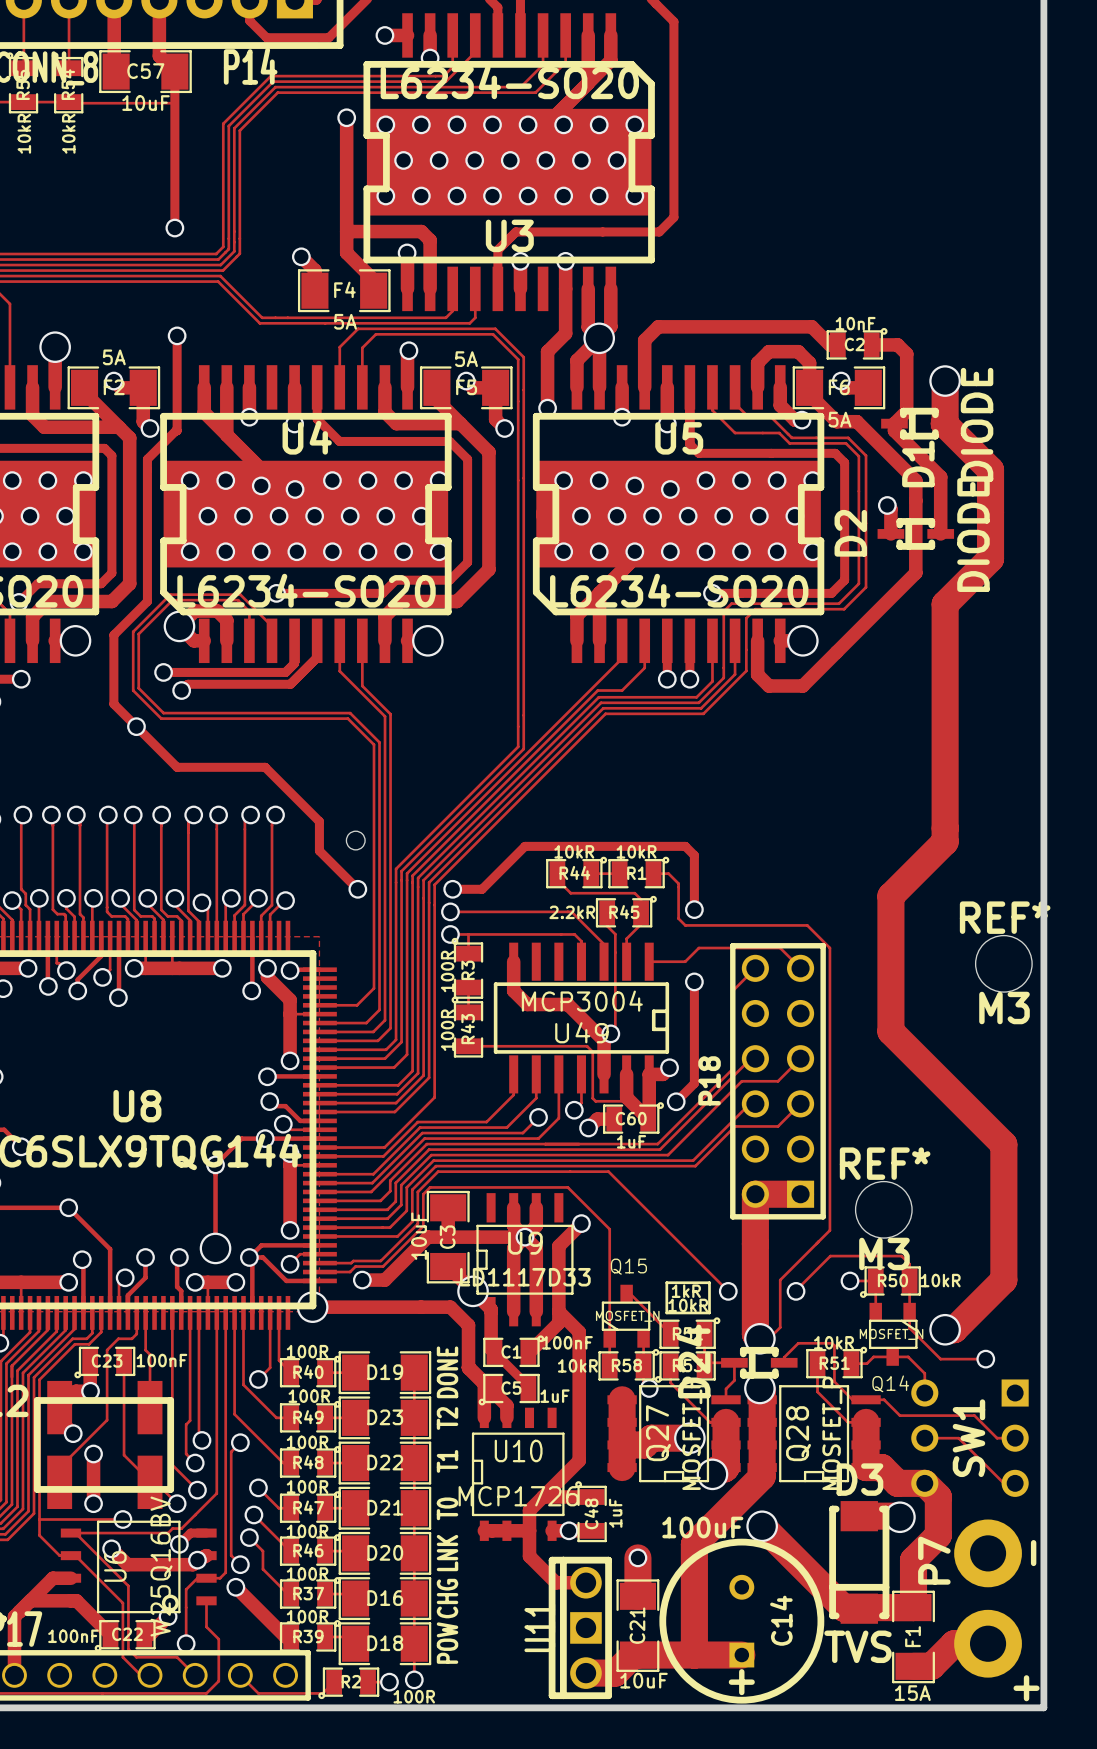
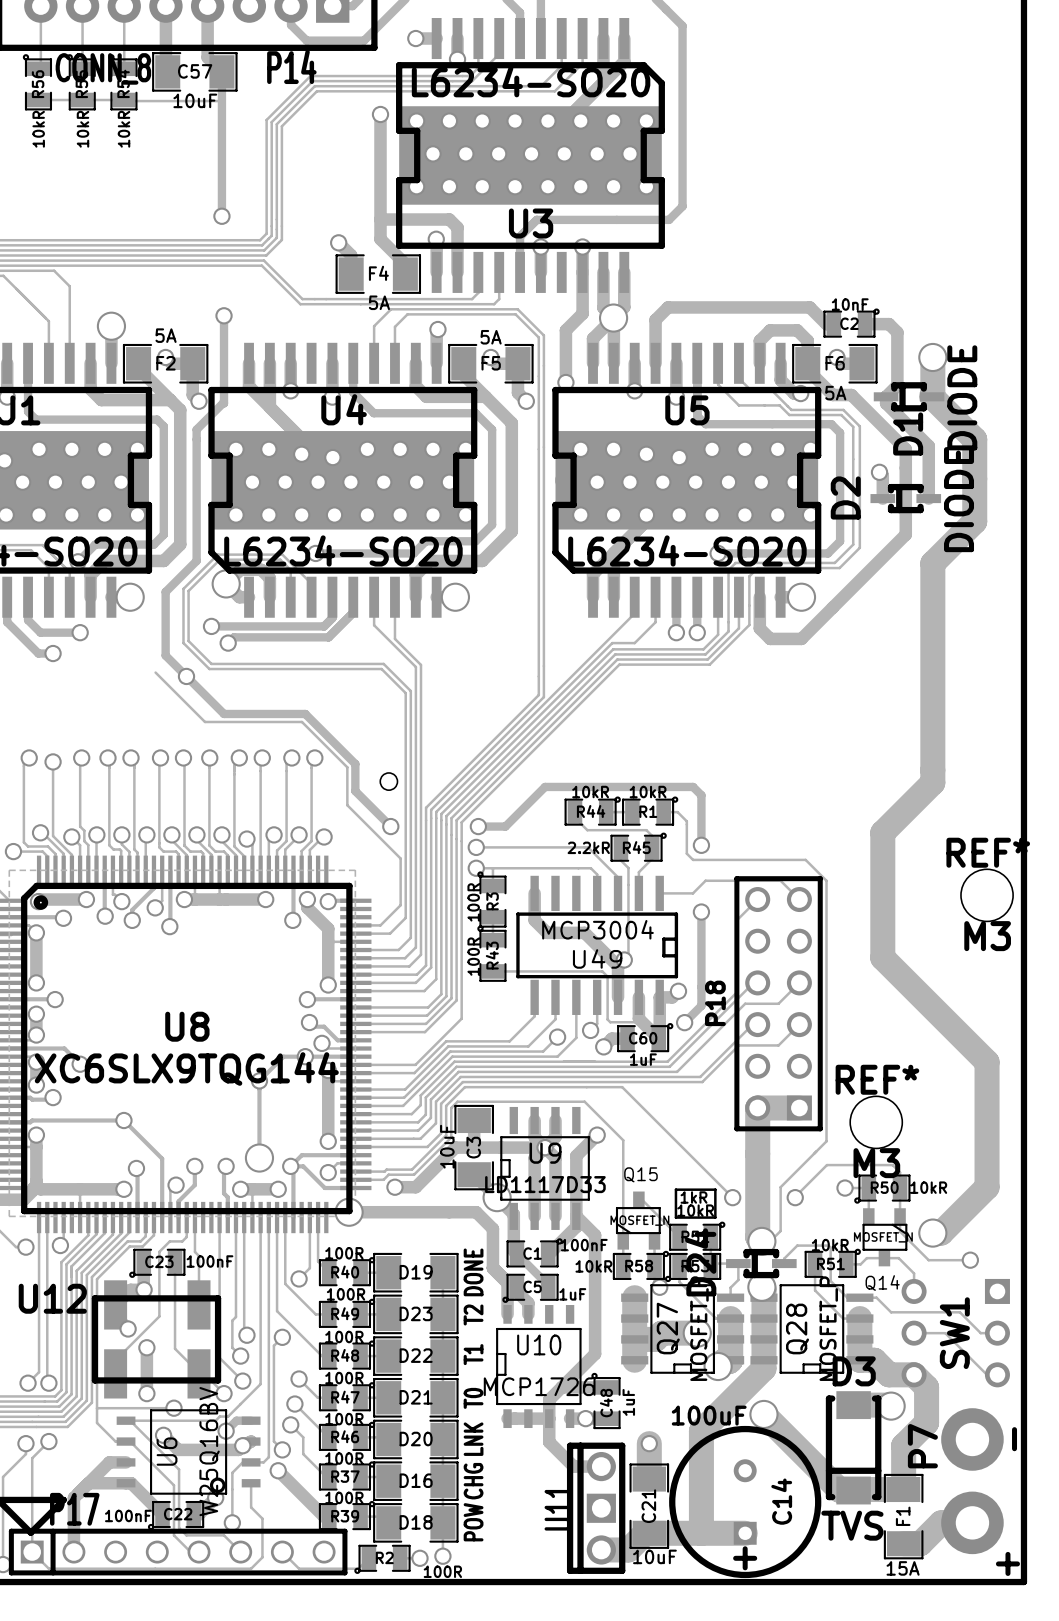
track: none -> (155, 672) (205, 721) (301, 721) (347, 767) (347, 805) (400, 858) (400, 905) (380, 925) (355, 925)

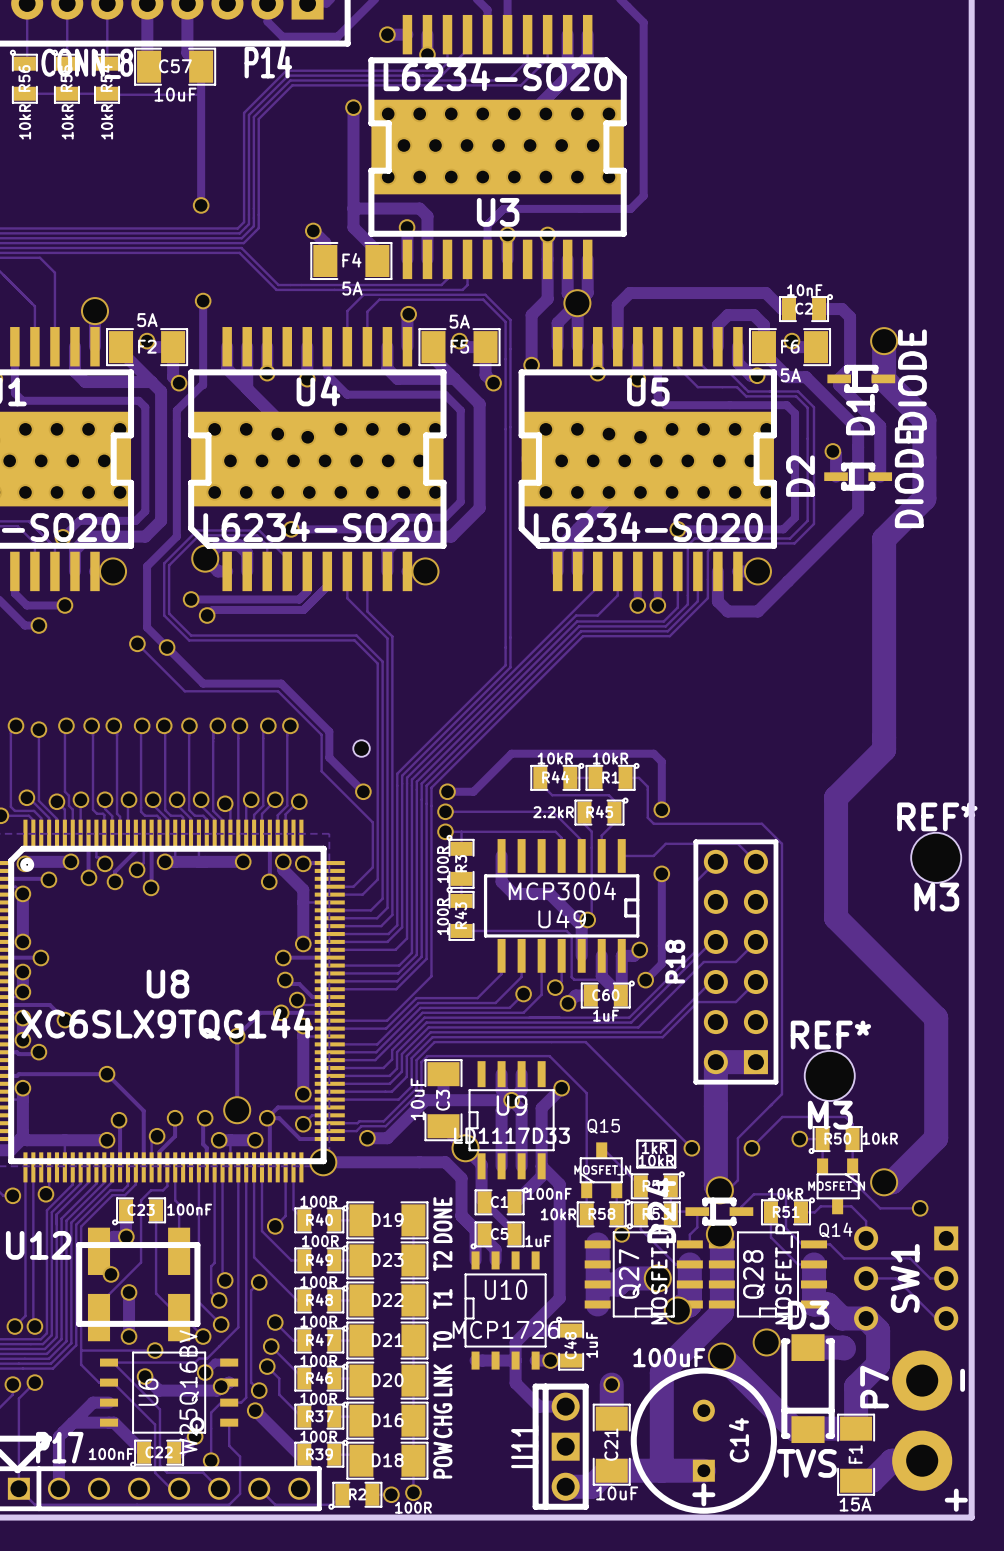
via: none -> (137, 643)
via position: (891, 1406) -> (766, 1342)

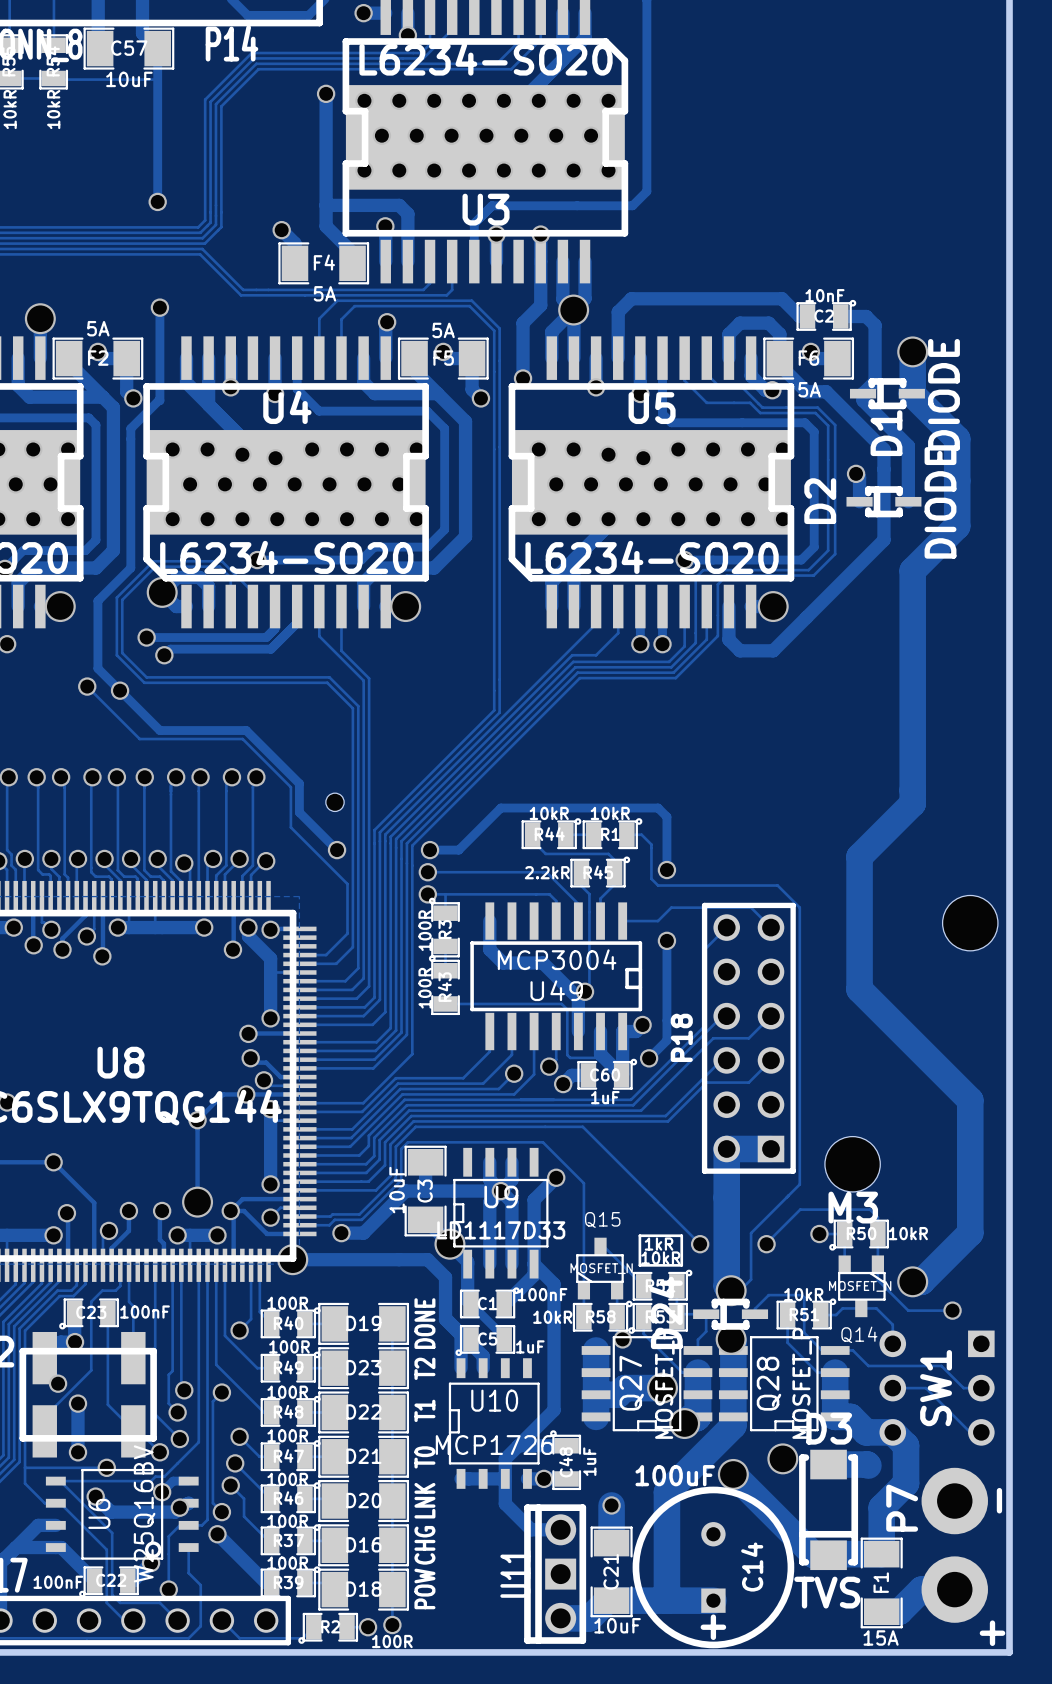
REF* name: REF* (937, 816) -> none
REF* value: M3 (936, 897) -> none
REF* name: REF* (830, 1035) -> none

